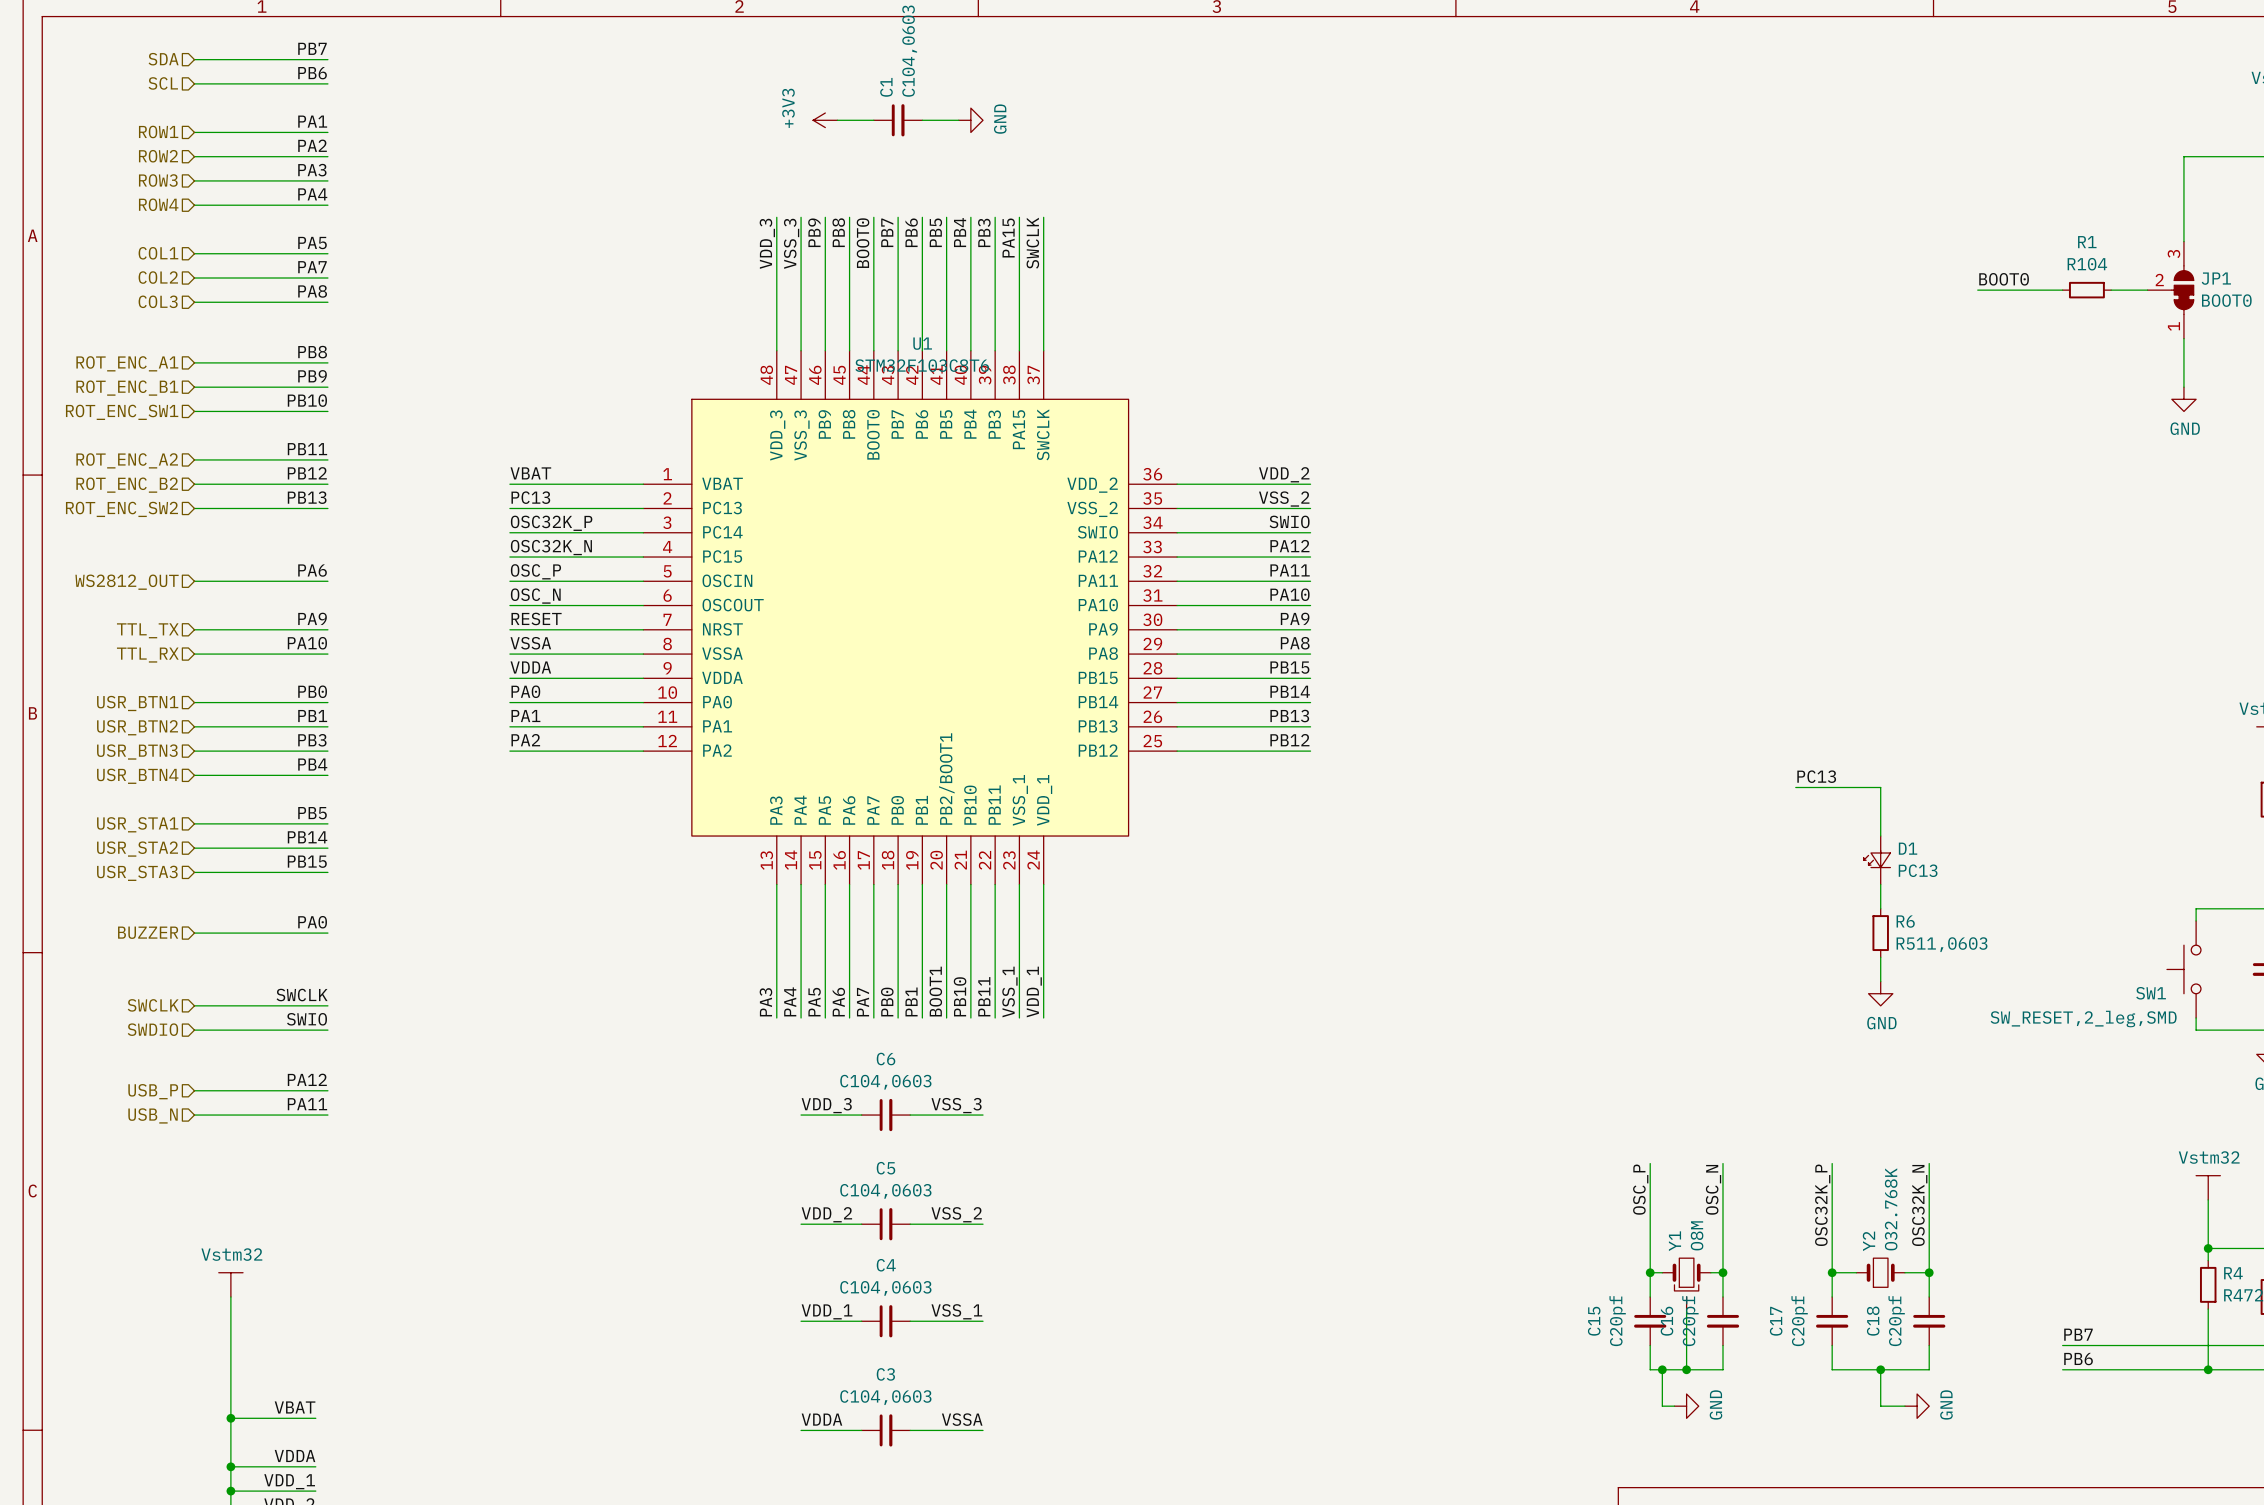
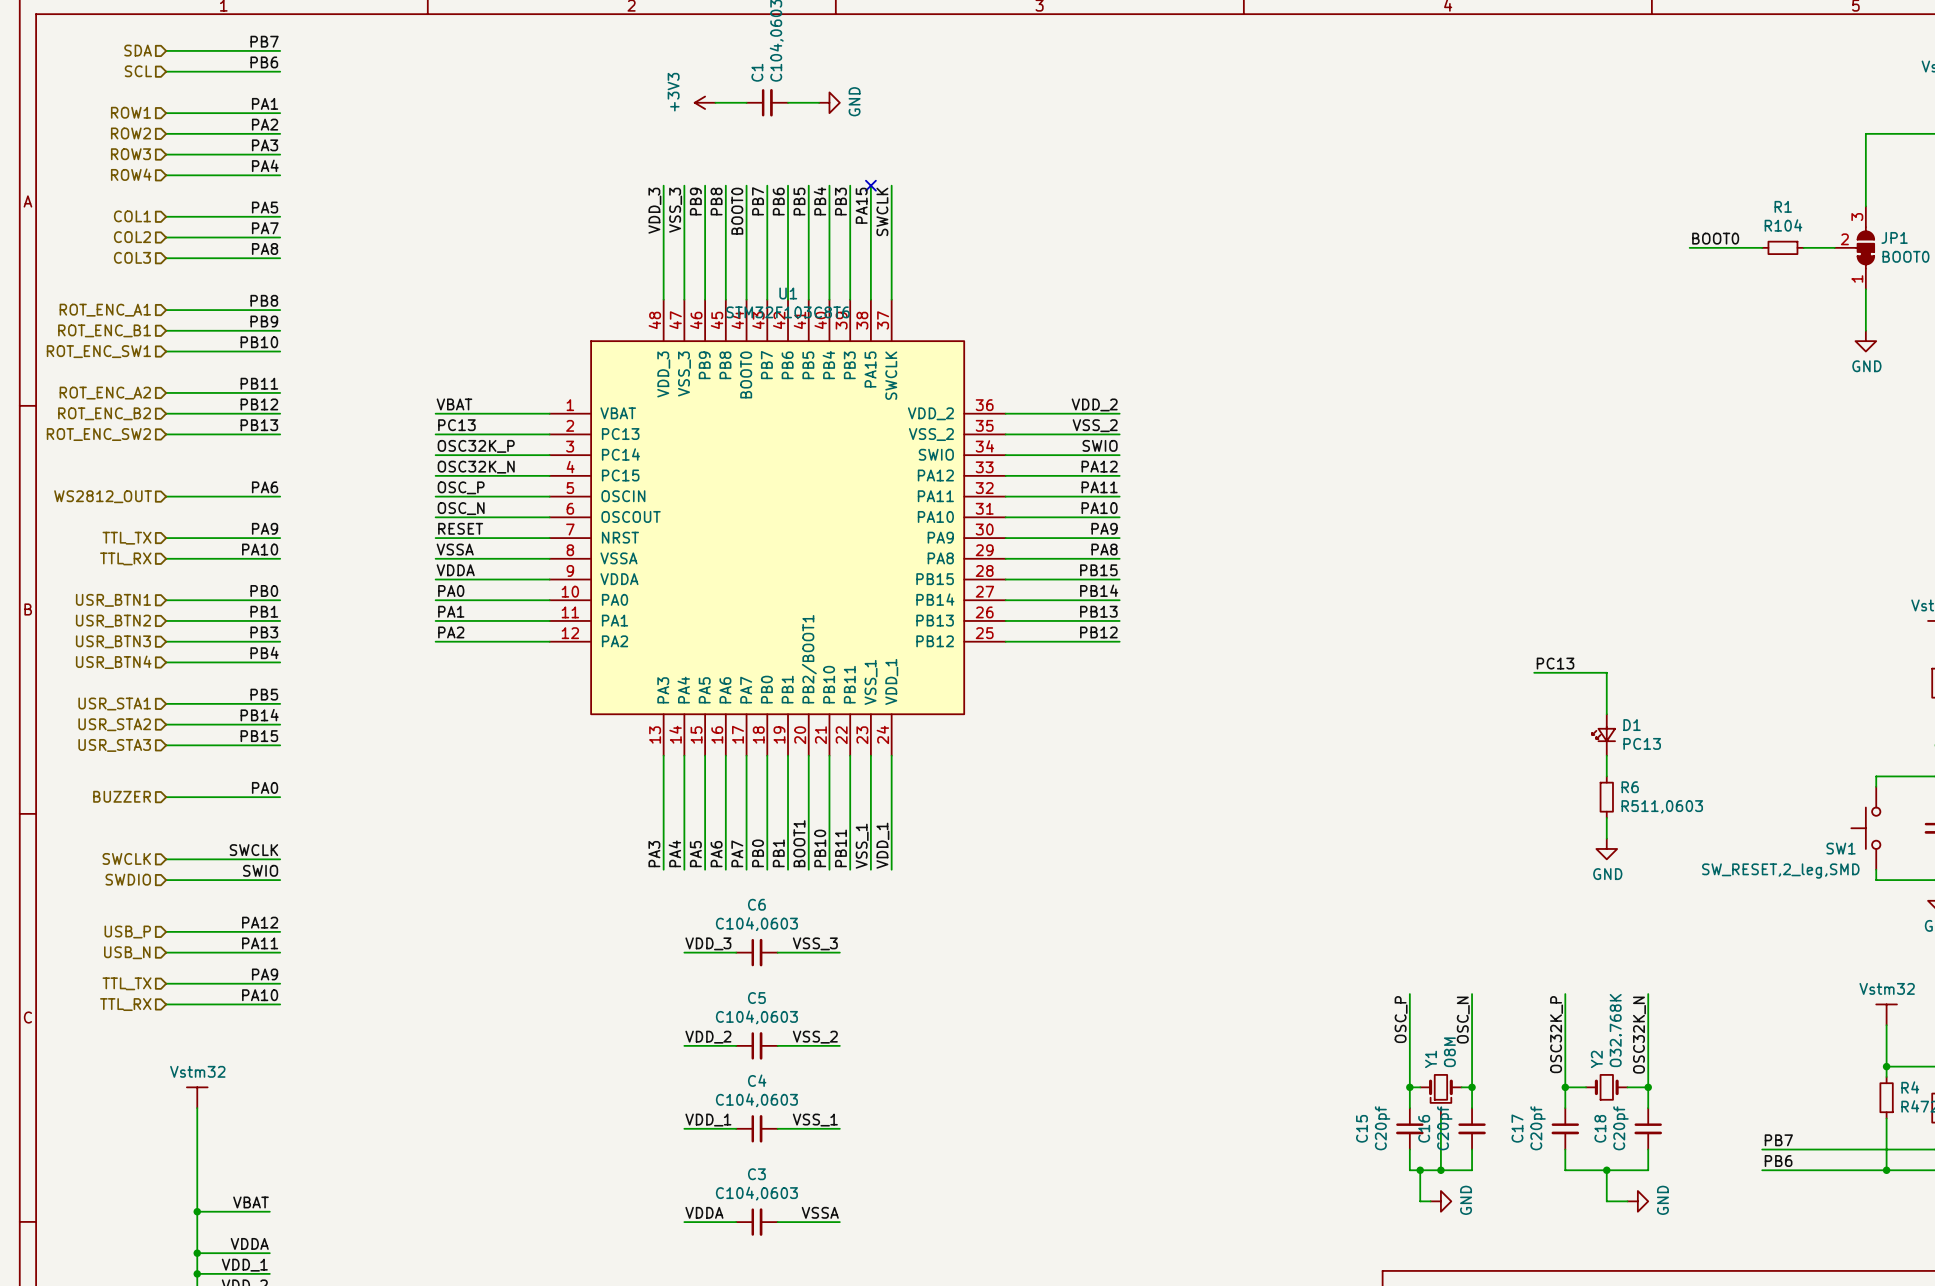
no-connect mark: none -> (870, 185)
label: none -> PA9 (265, 974)
wire: none -> (166, 983) (280, 983)
hierarchical label: none -> TTL_TX (127, 983)
label: none -> PA10 (260, 995)
wire: none -> (166, 1004) (280, 1004)
hierarchical label: none -> TTL_RX (125, 1004)

